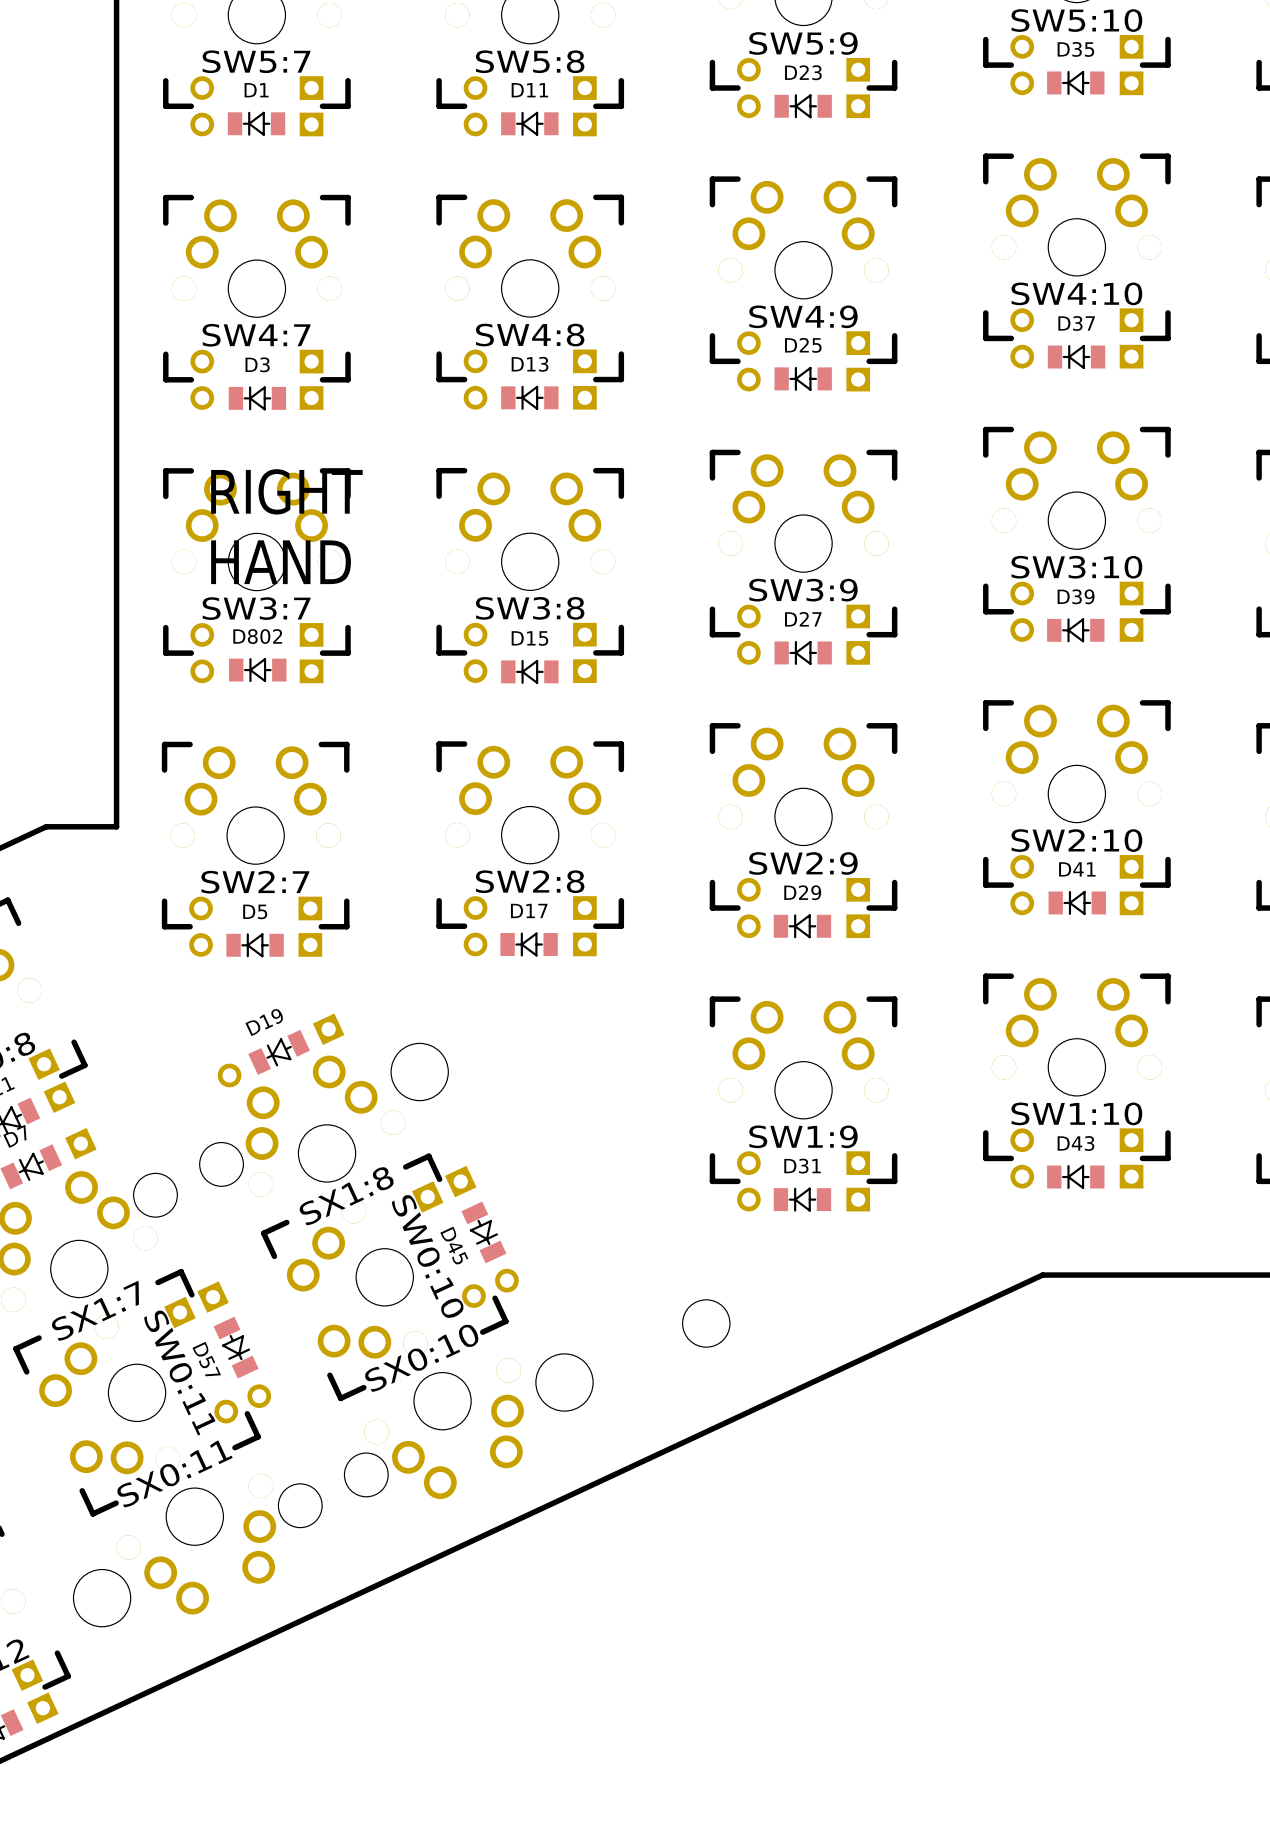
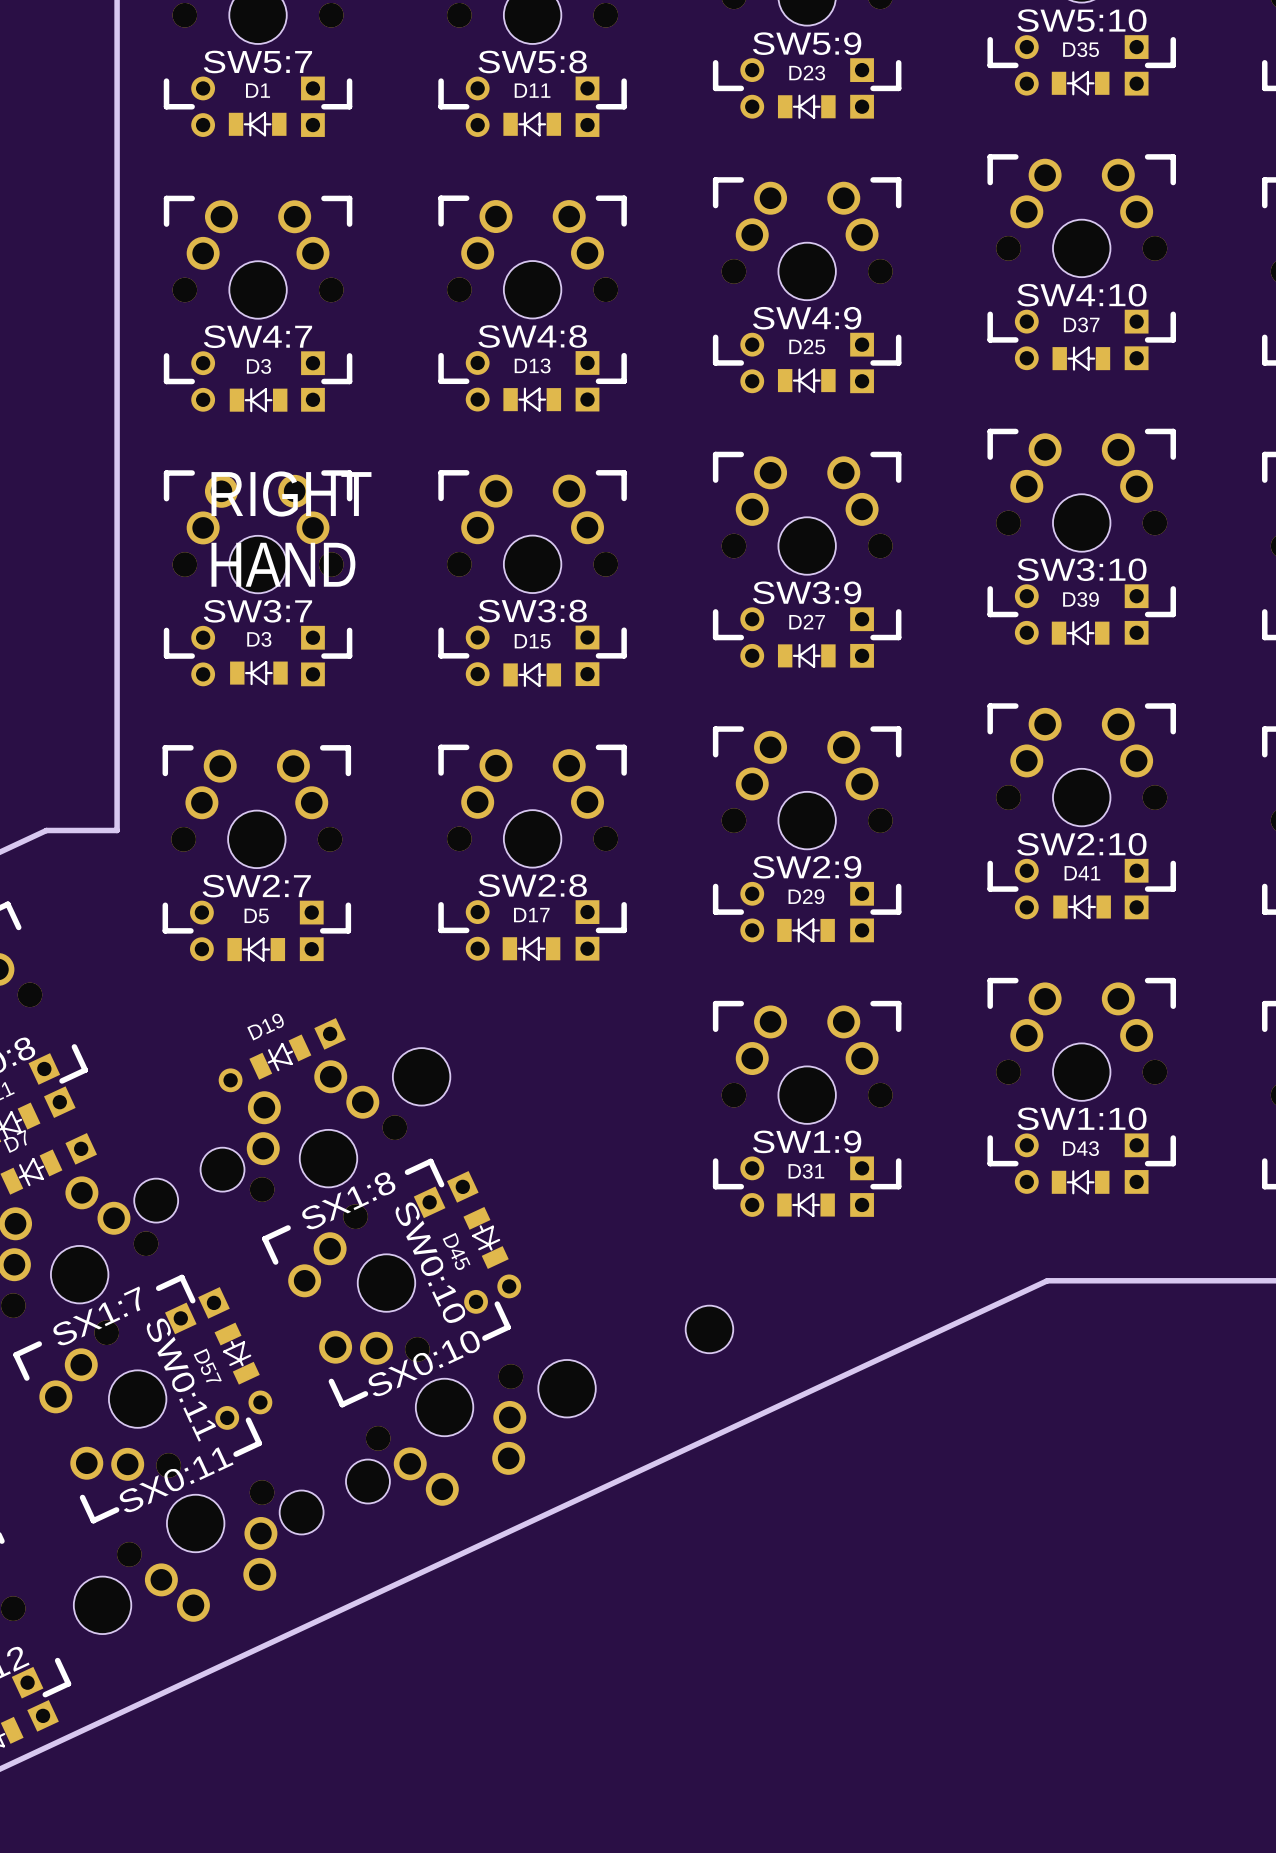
D802 name: D802 (257, 636) -> D3 (259, 639)

